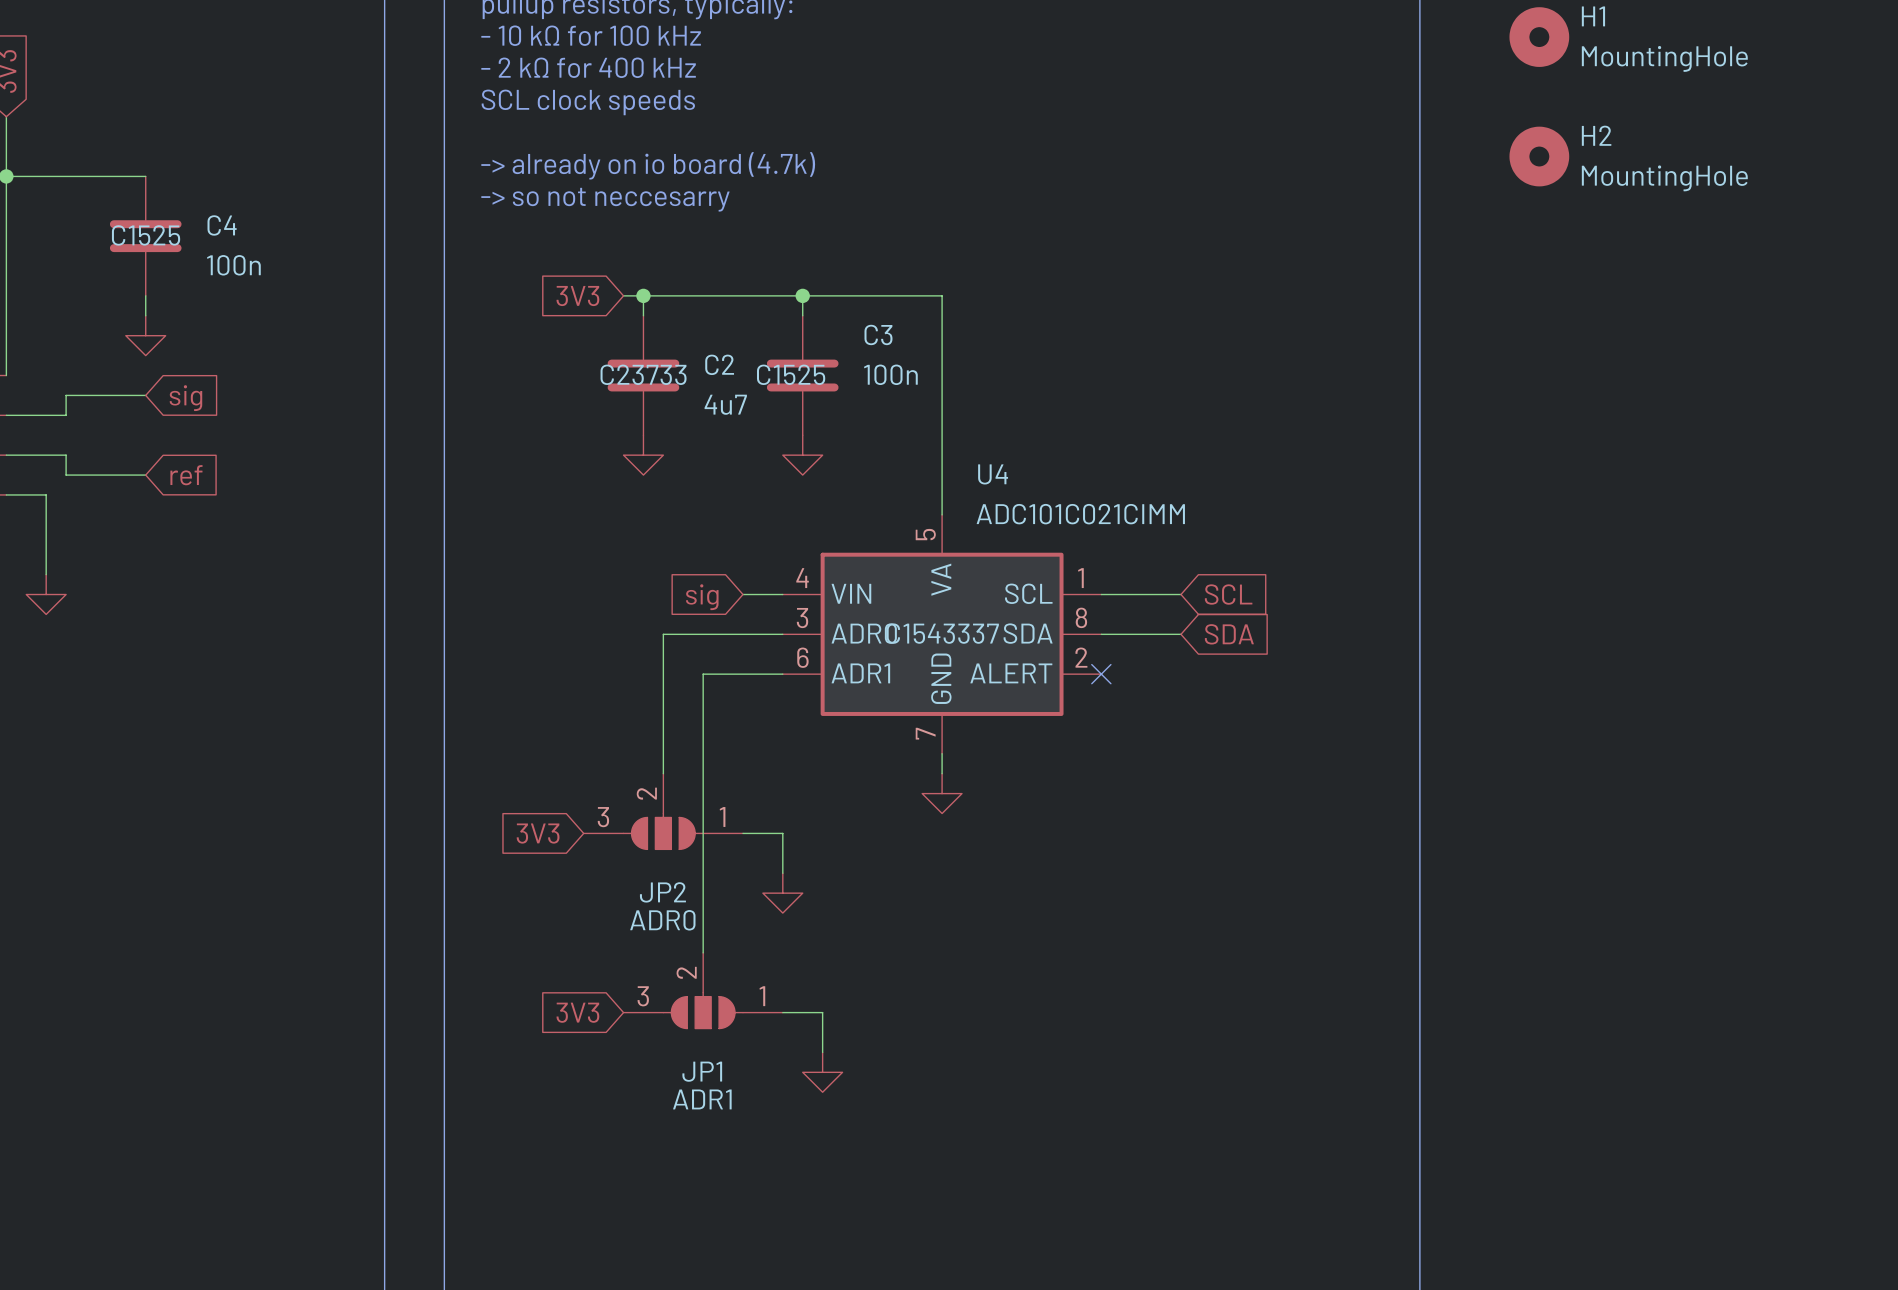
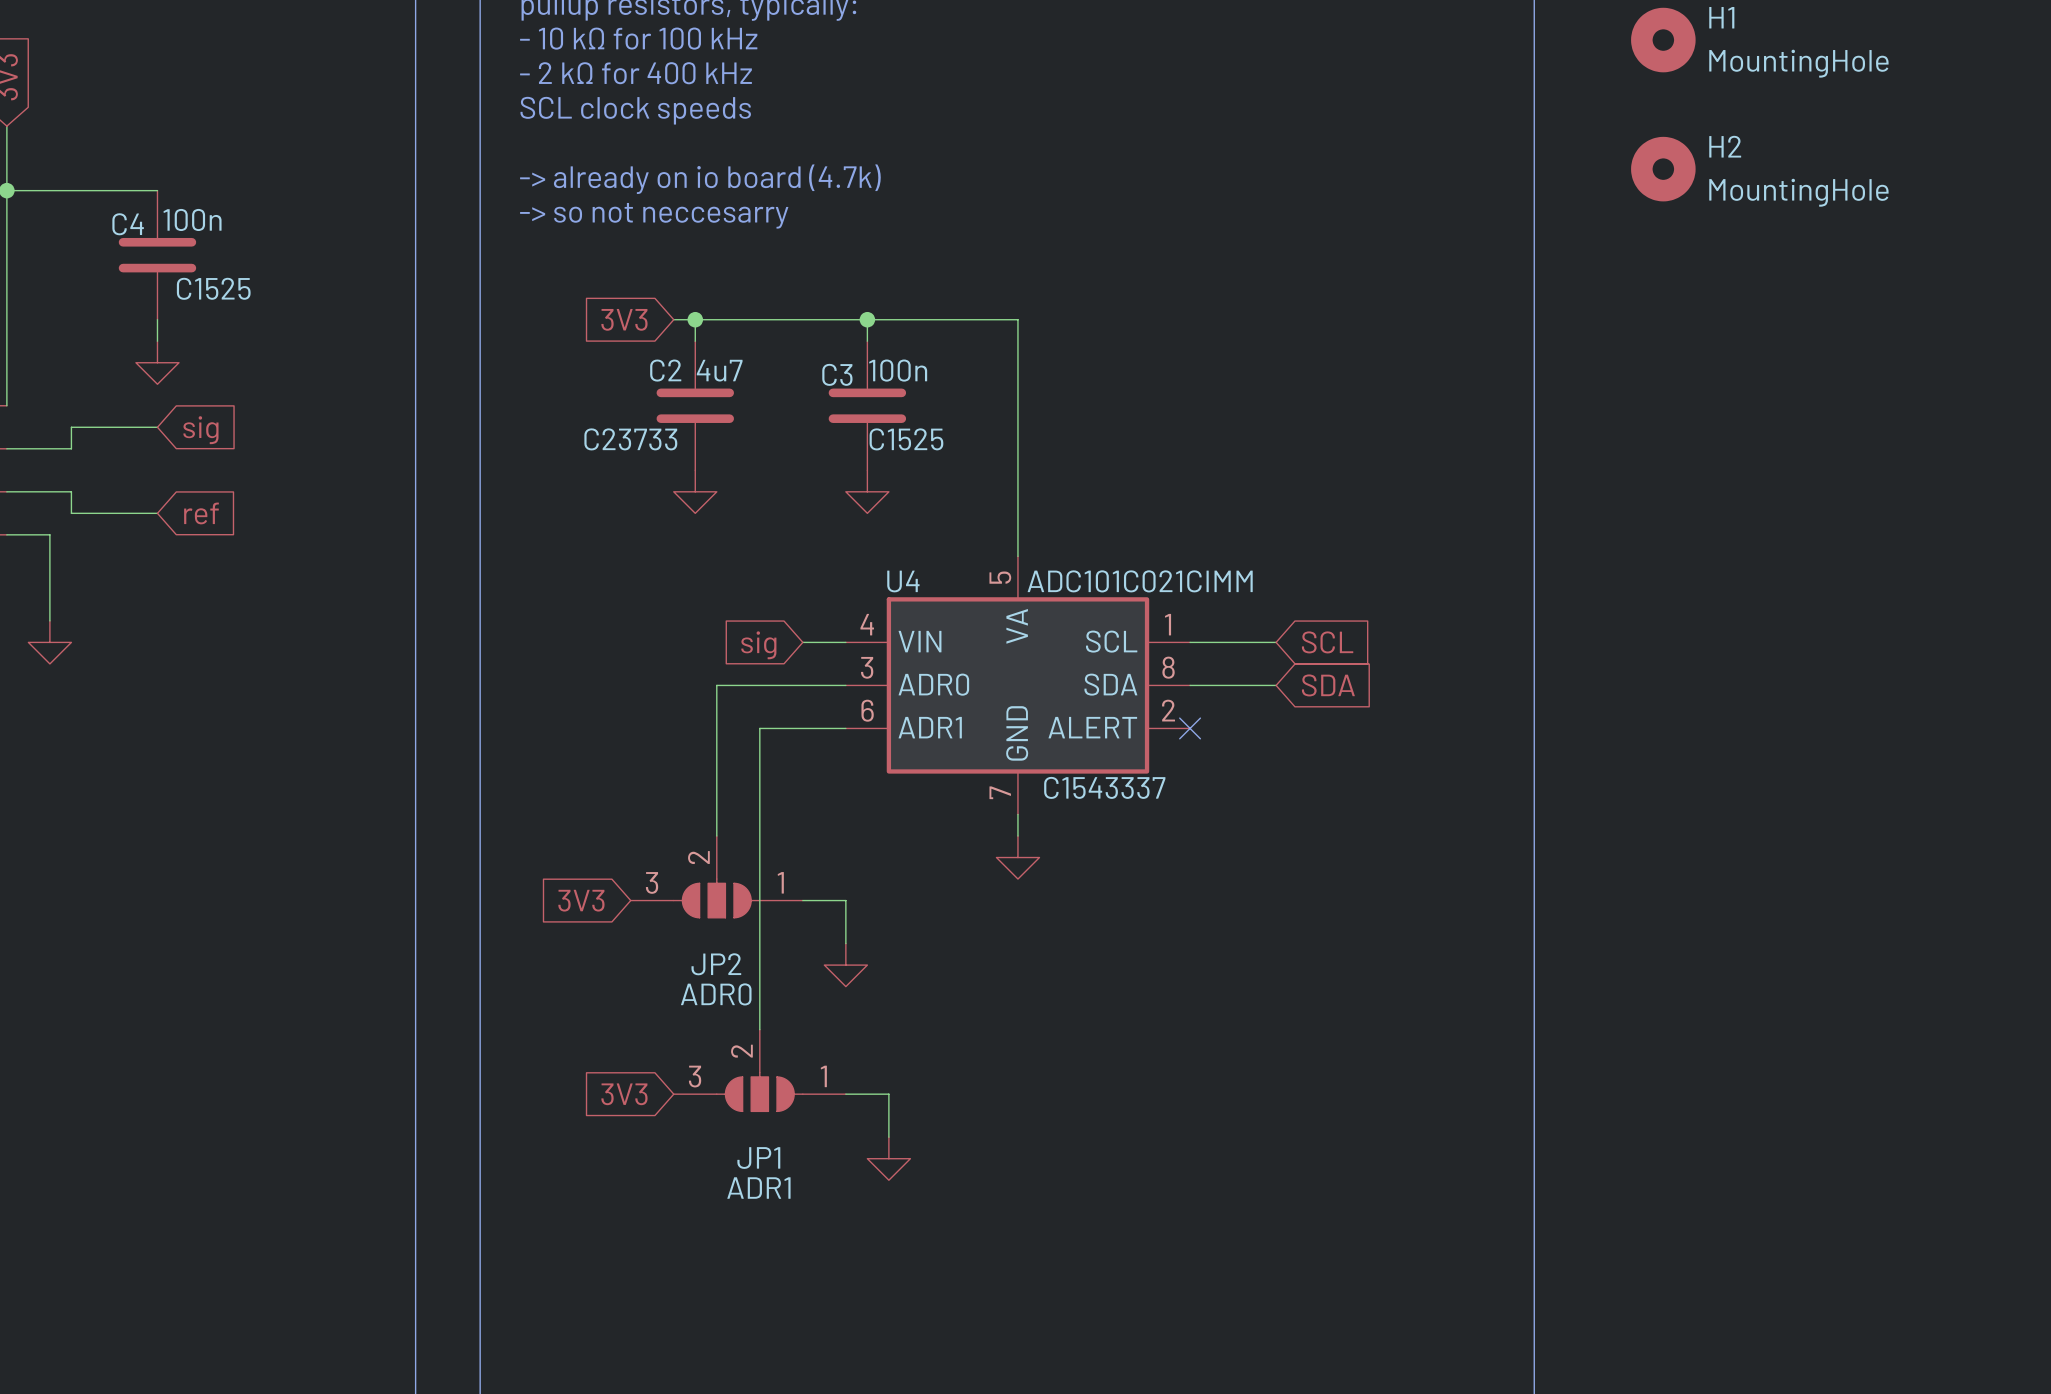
C4 name position: C4 (222, 225) -> C4 (128, 224)
C4 text position: C1525 (146, 235) -> C1525 (213, 288)
C4 value position: 100n (233, 265) -> 100n (192, 219)
C3 name position: C3 (878, 334) -> C3 (837, 374)
C2 name position: C2 (719, 364) -> C2 (665, 370)
C2 text position: C23733 (643, 374) -> C23733 (630, 439)
C3 text position: C1525 (791, 374) -> C1525 (906, 439)
C3 value position: 100n (890, 374) -> 100n (898, 370)
C2 value position: 4u7 (725, 404) -> 4u7 (719, 370)
U4 name position: U4 (993, 474) -> U4 (903, 581)
U4 value position: ADC101C021CIMM (1080, 514) -> ADC101C021CIMM (1140, 581)
U4 text position: C1543337 (942, 633) -> C1543337 (1104, 787)

